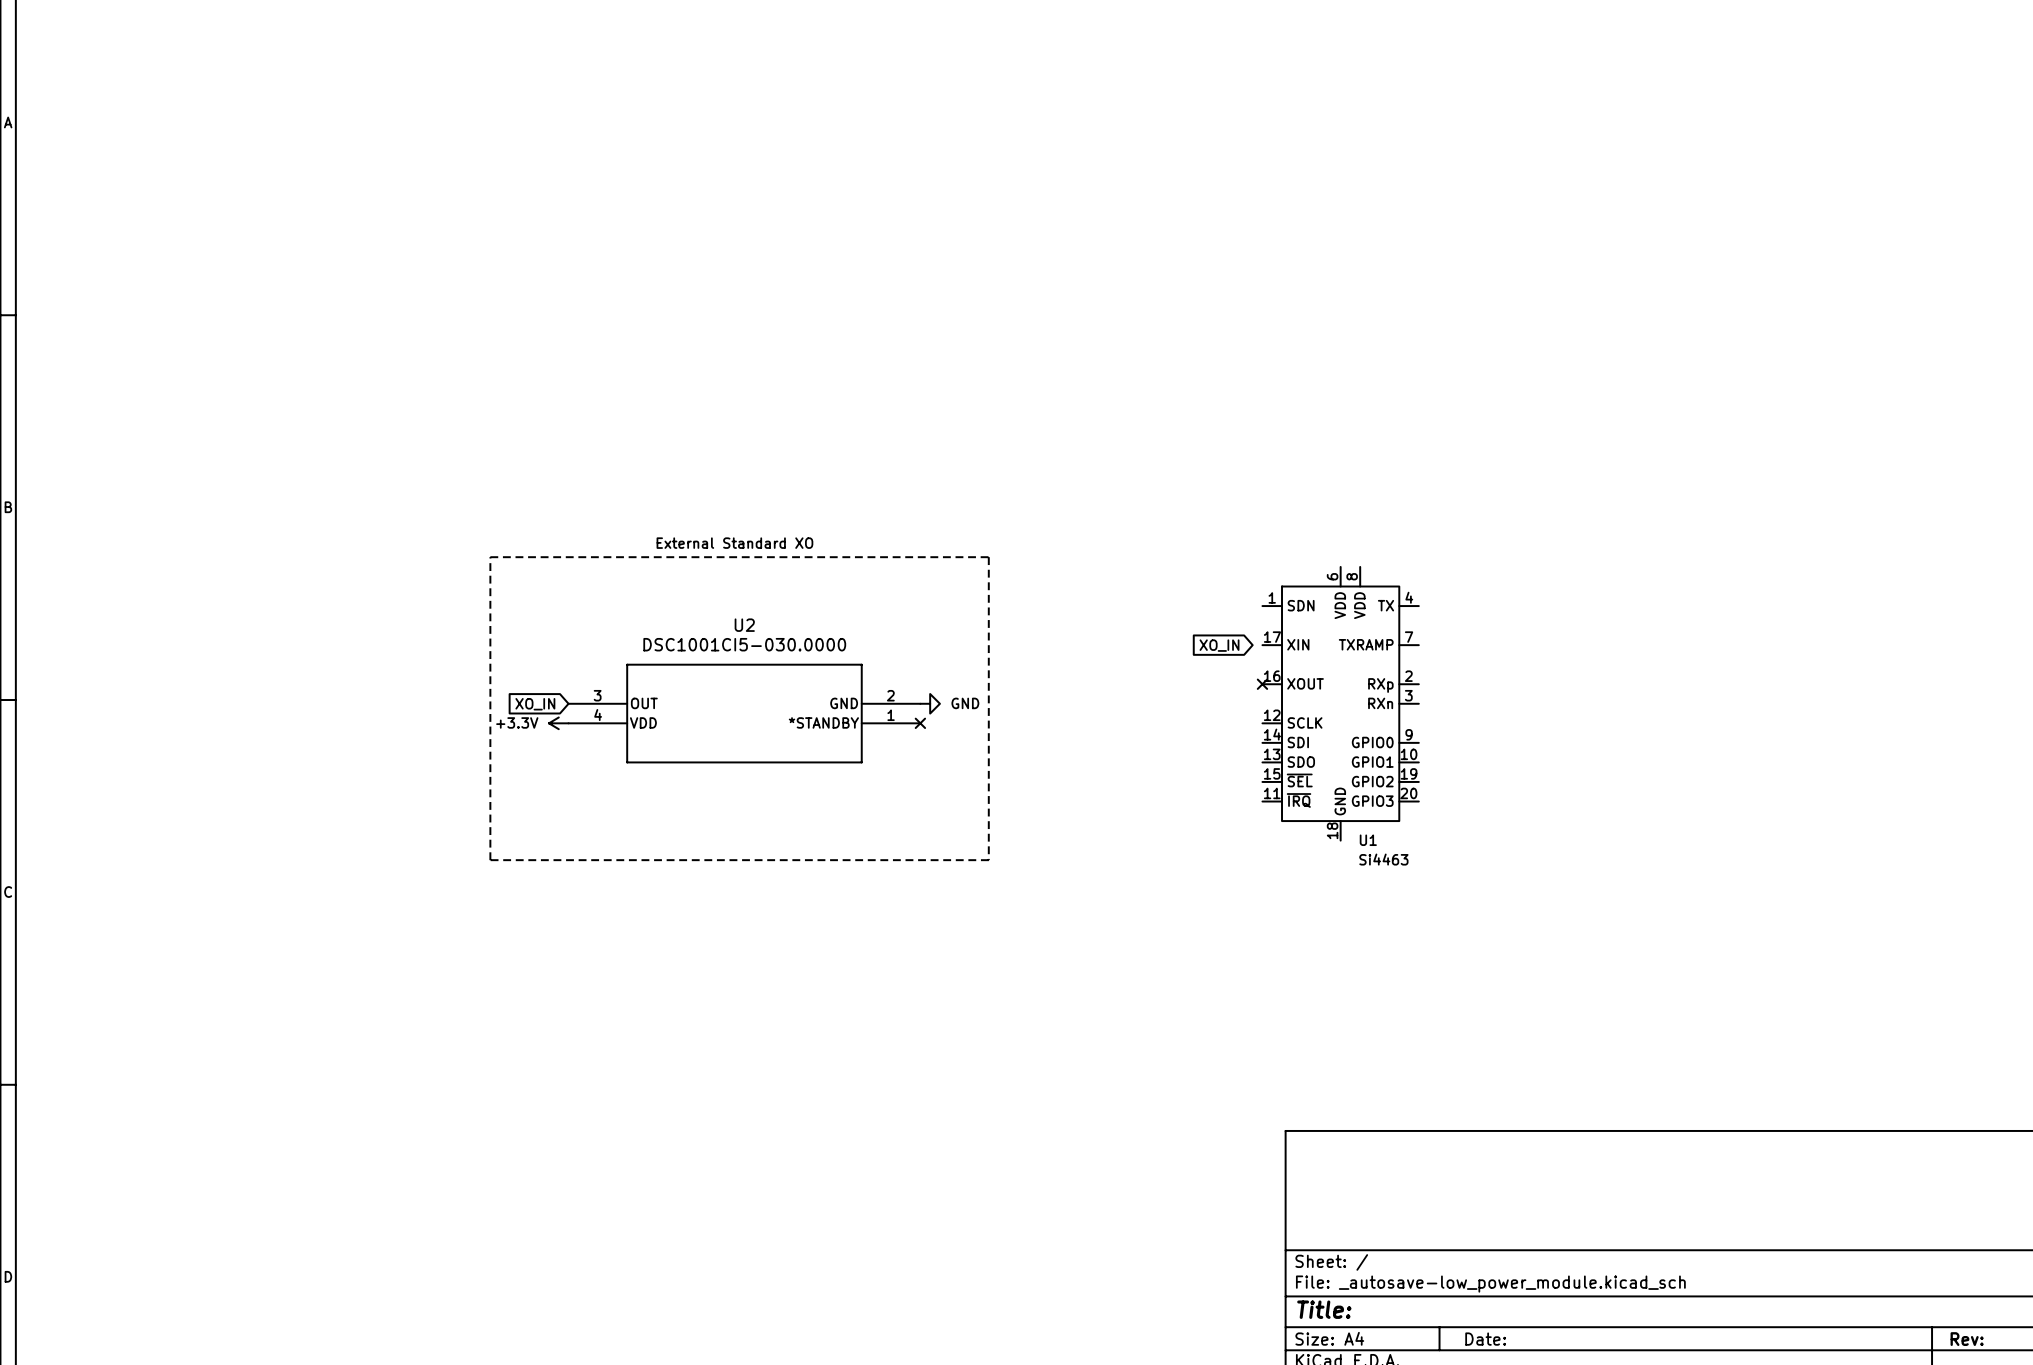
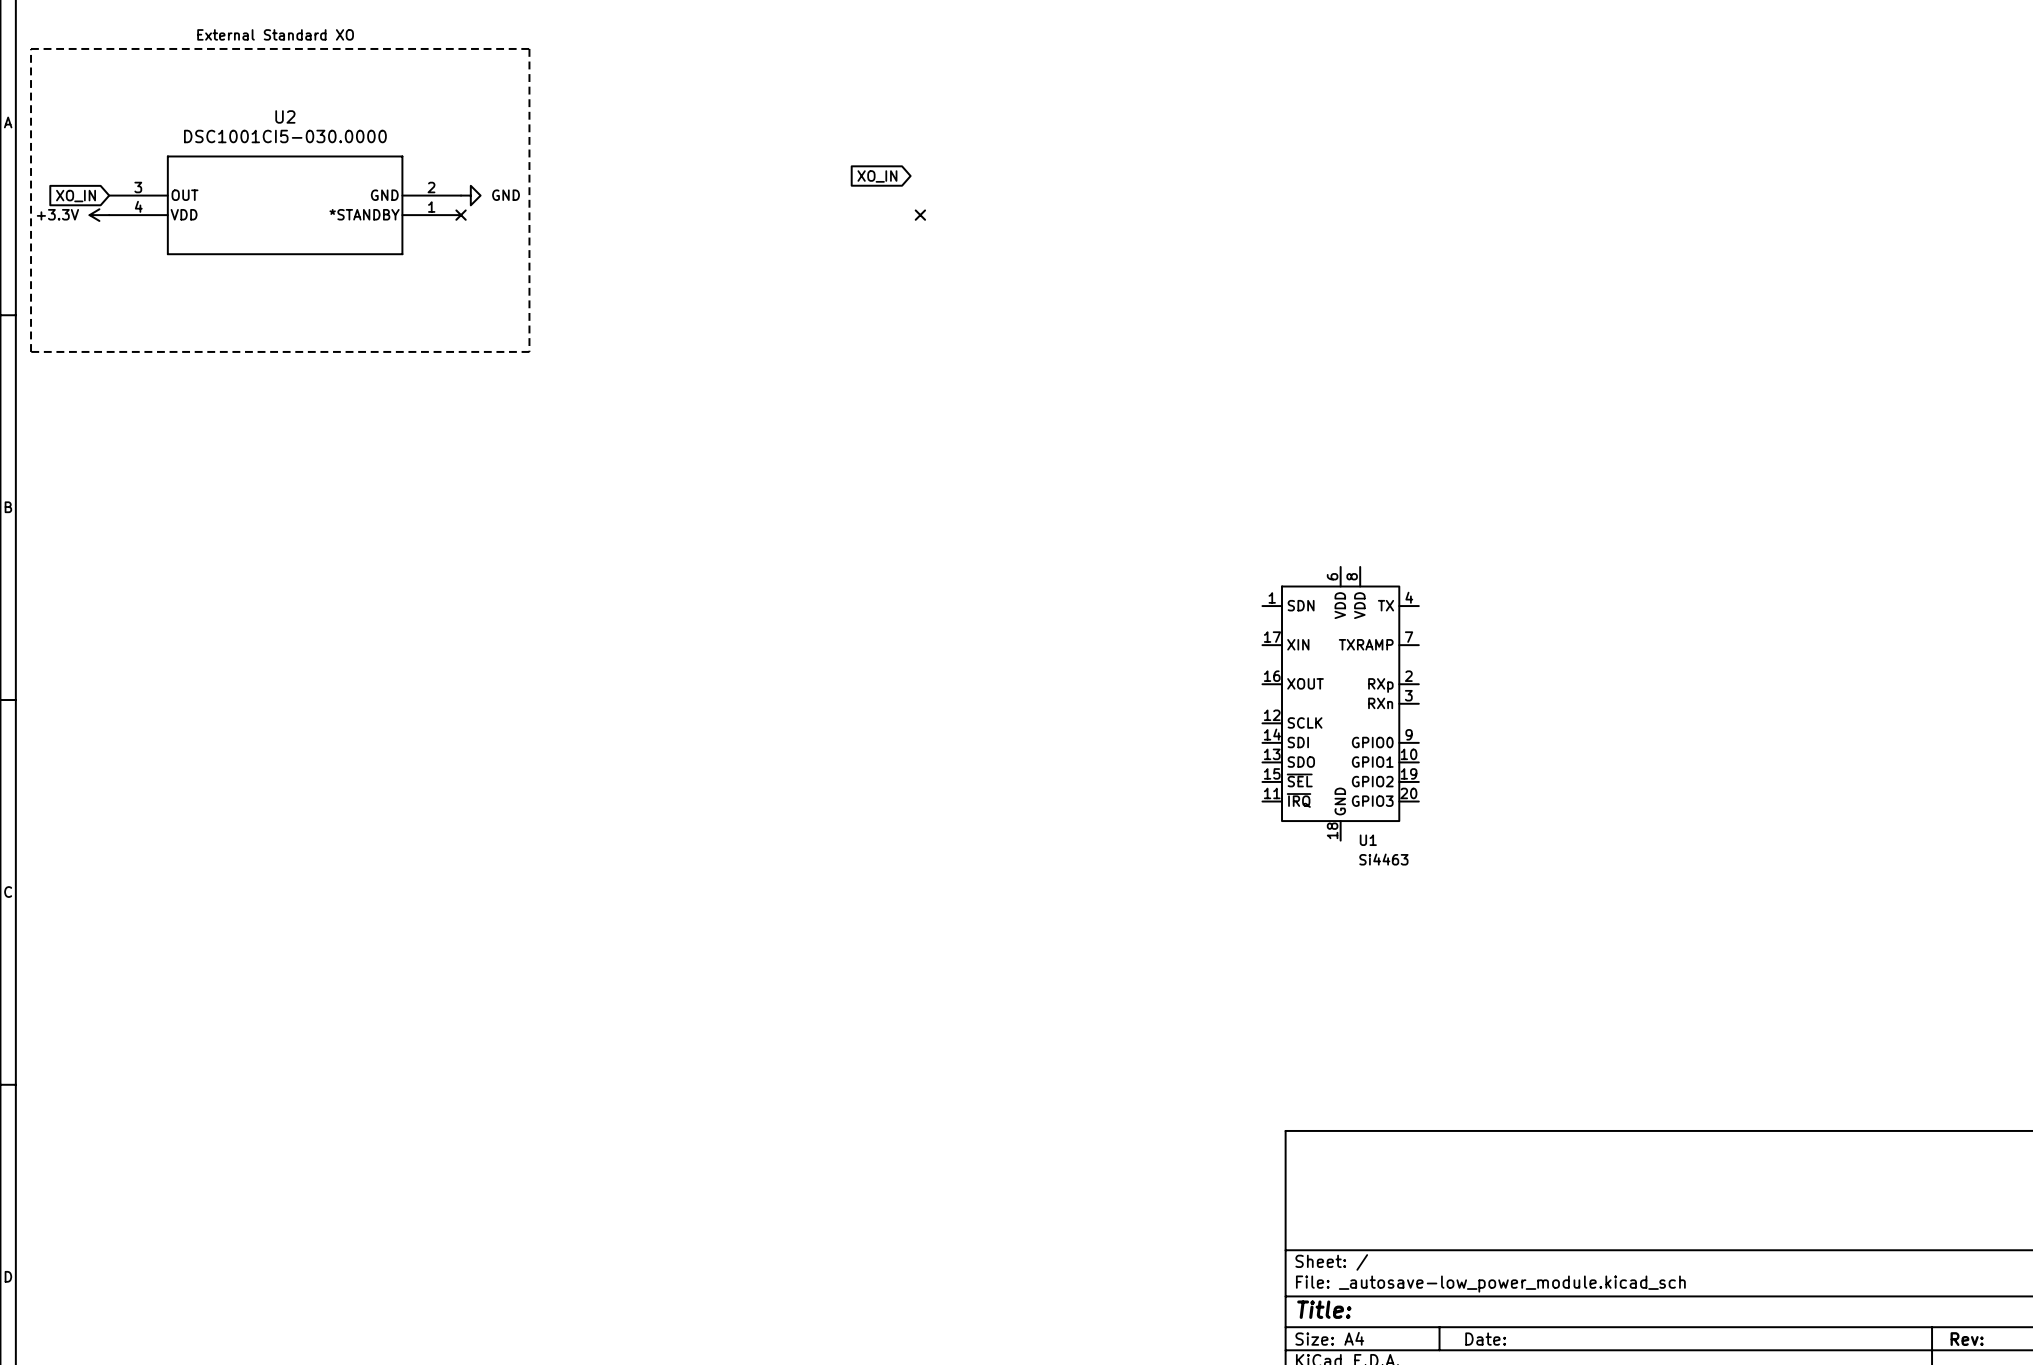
text: none -> External Standard XO (275, 34)
line: none -> (31, 48) (529, 48) (529, 351) (31, 351) (31, 48)
global label: none -> XO_IN (877, 176)
power symbol: none -> GND (470, 195)
global label: none -> XO_IN (76, 196)
power symbol: none -> +3.3V (99, 215)
no-connect mark: none -> (461, 215)
no-connect mark: none -> (920, 215)
text: External Standard XO (734, 543) -> none
line: (490, 557) (988, 557) (988, 860) (490, 860) (490, 557) -> none
global label: XO_IN (1219, 645) -> none
no-connect mark: (1262, 684) -> none
power symbol: GND (930, 703) -> none
global label: XO_IN (535, 704) -> none
U2 position: (744, 713) -> (285, 205)
power symbol: +3.3V (558, 723) -> none
no-connect mark: (920, 723) -> none

